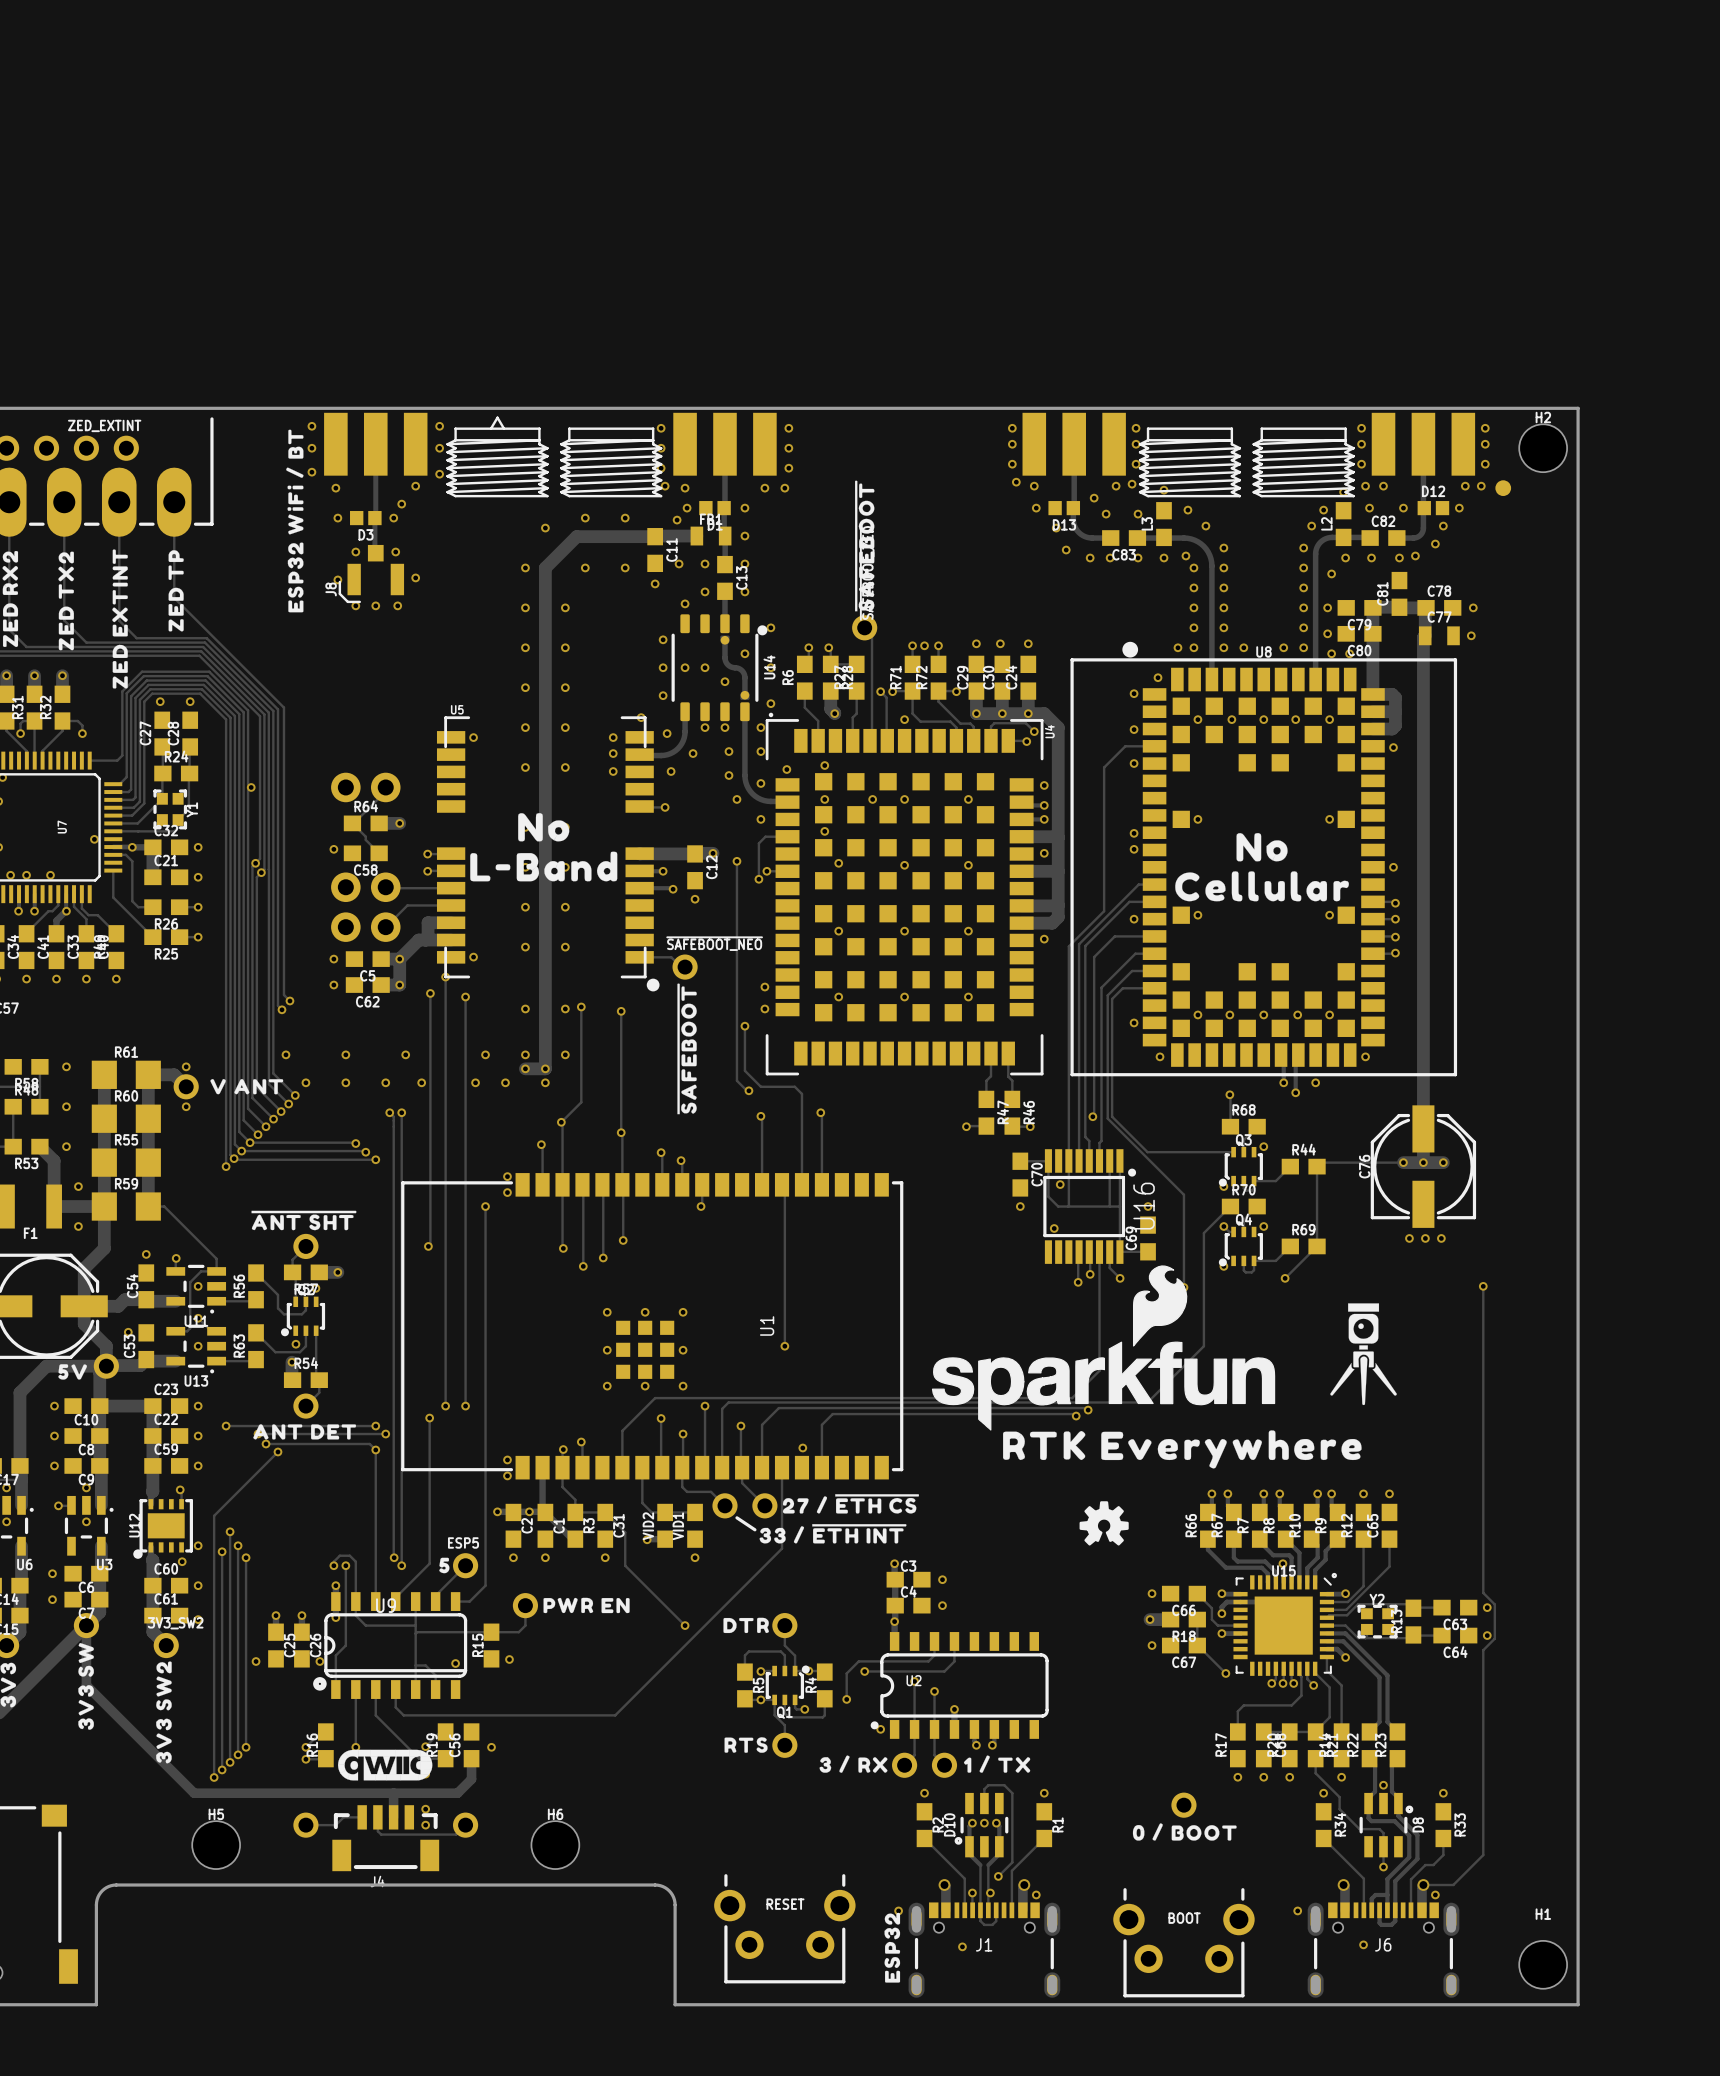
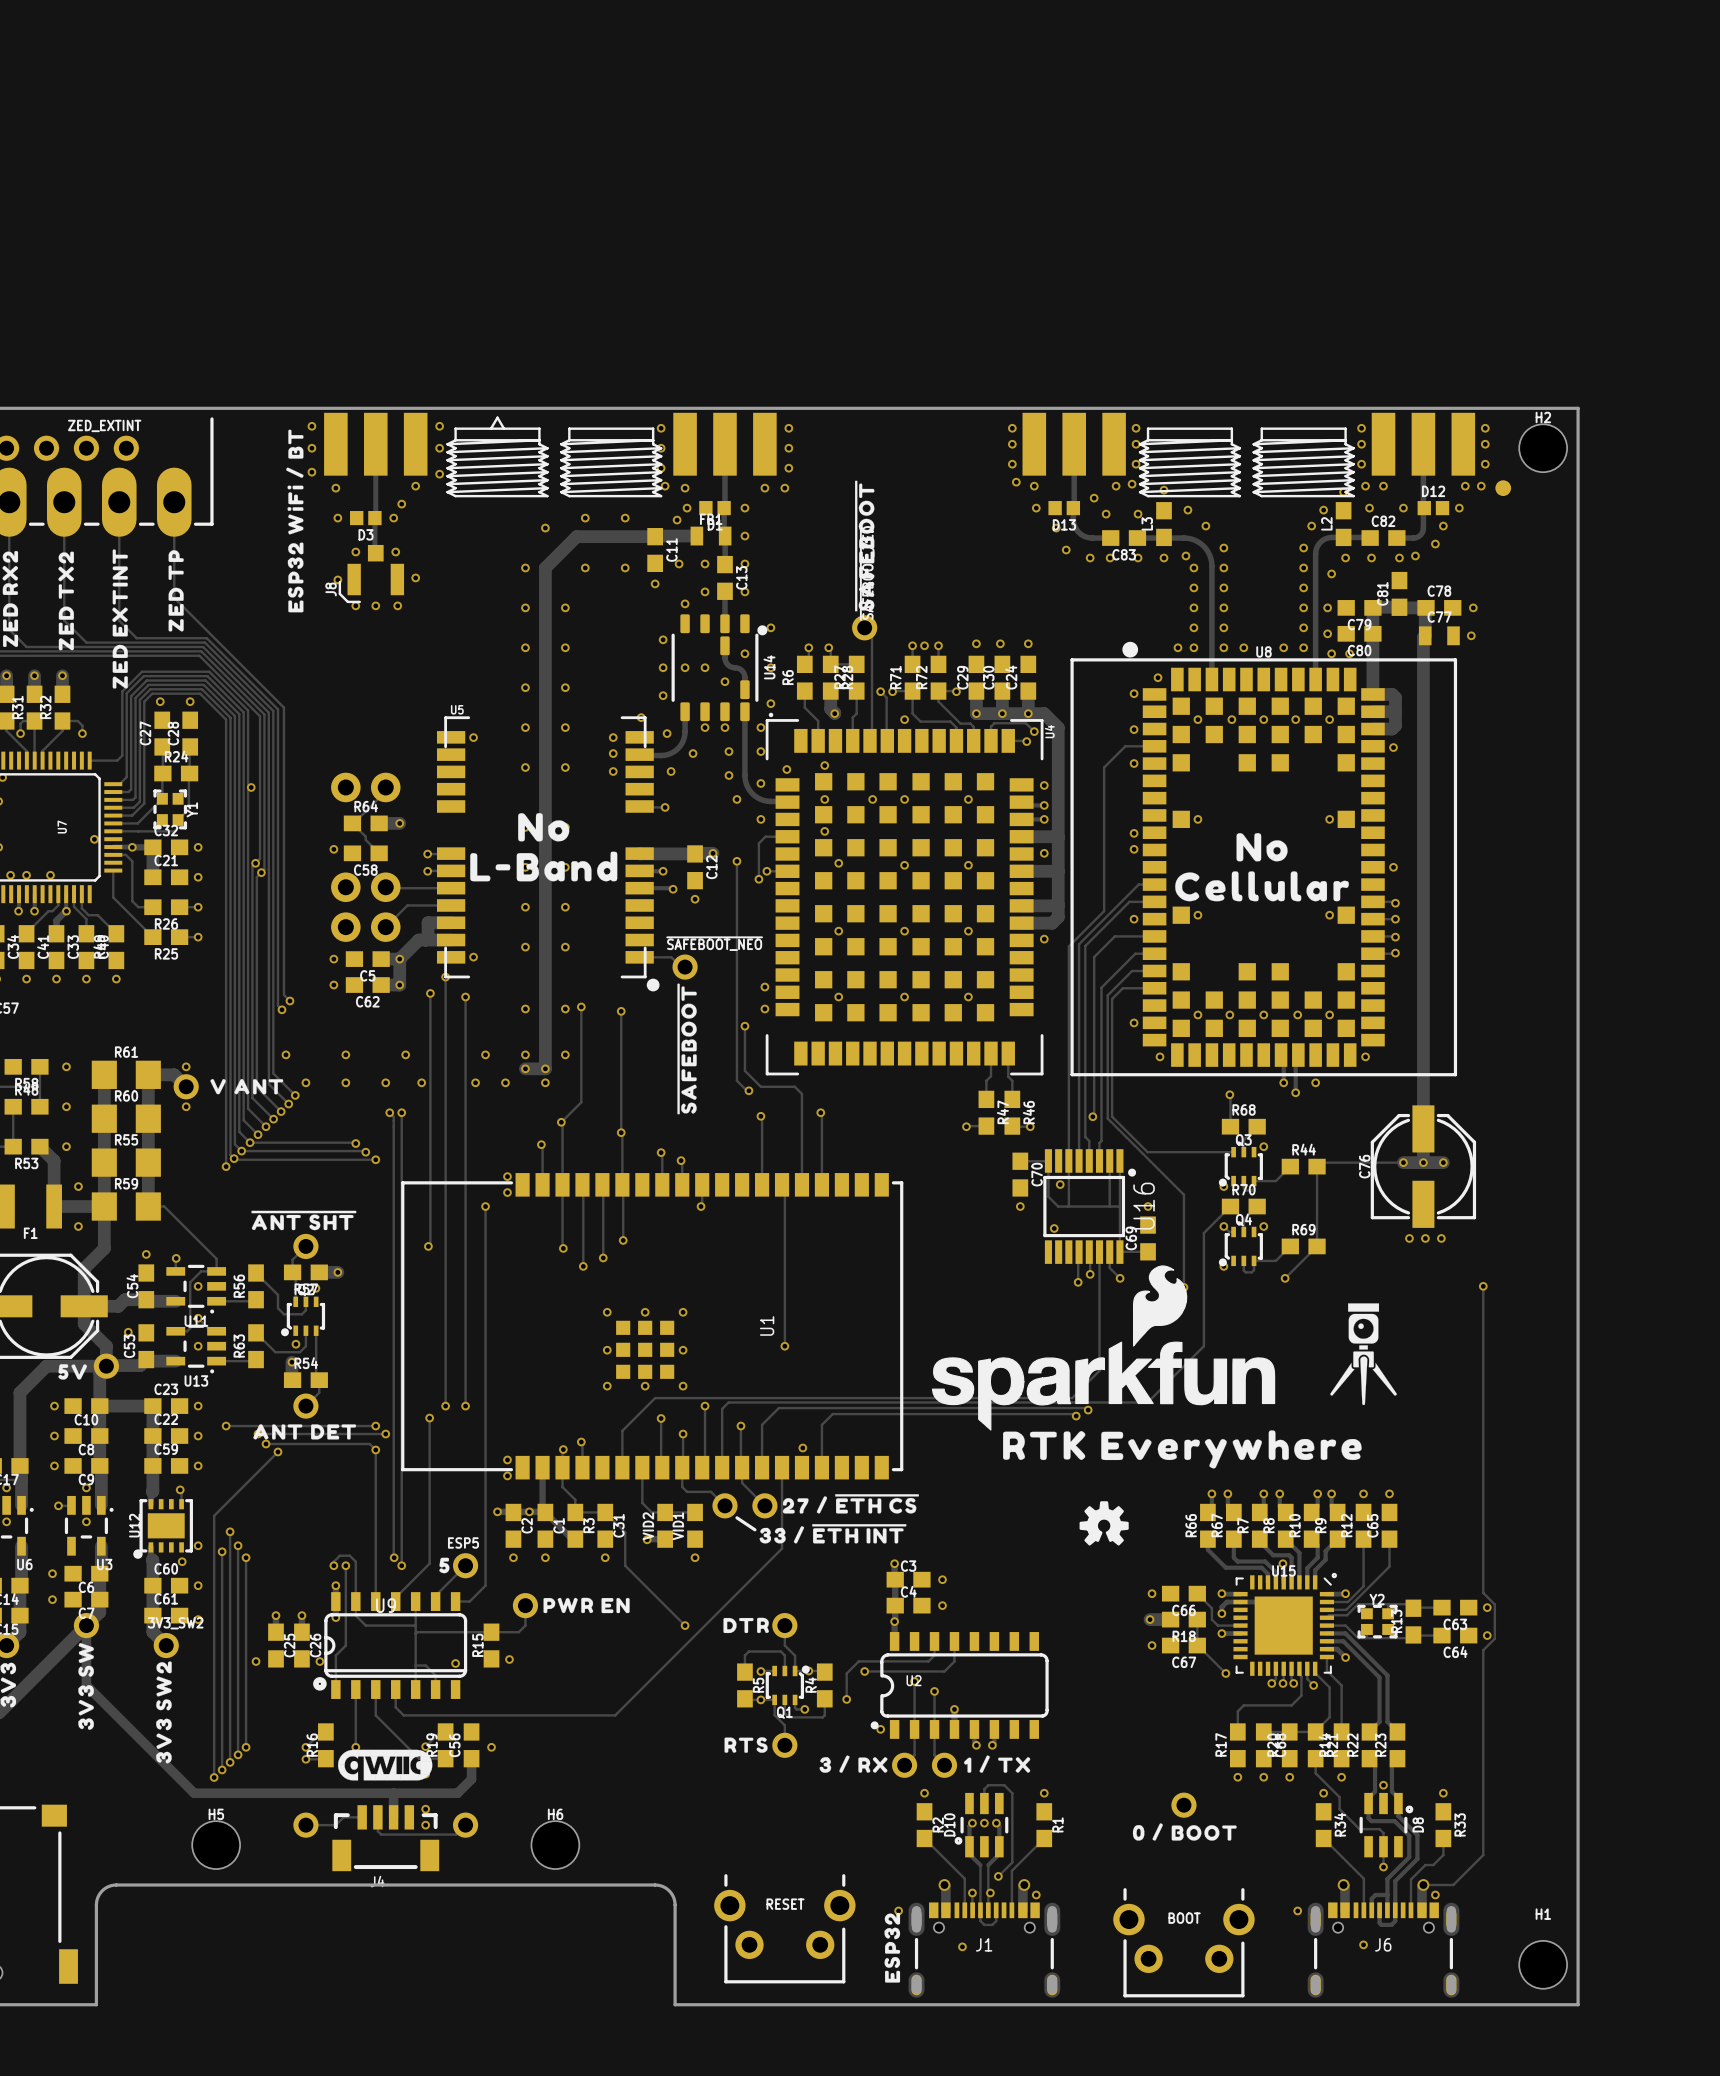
part footprint: [720, 635, 730, 645] -> [720, 636, 730, 656]
part footprint: [740, 690, 750, 700] -> [740, 680, 750, 700]

